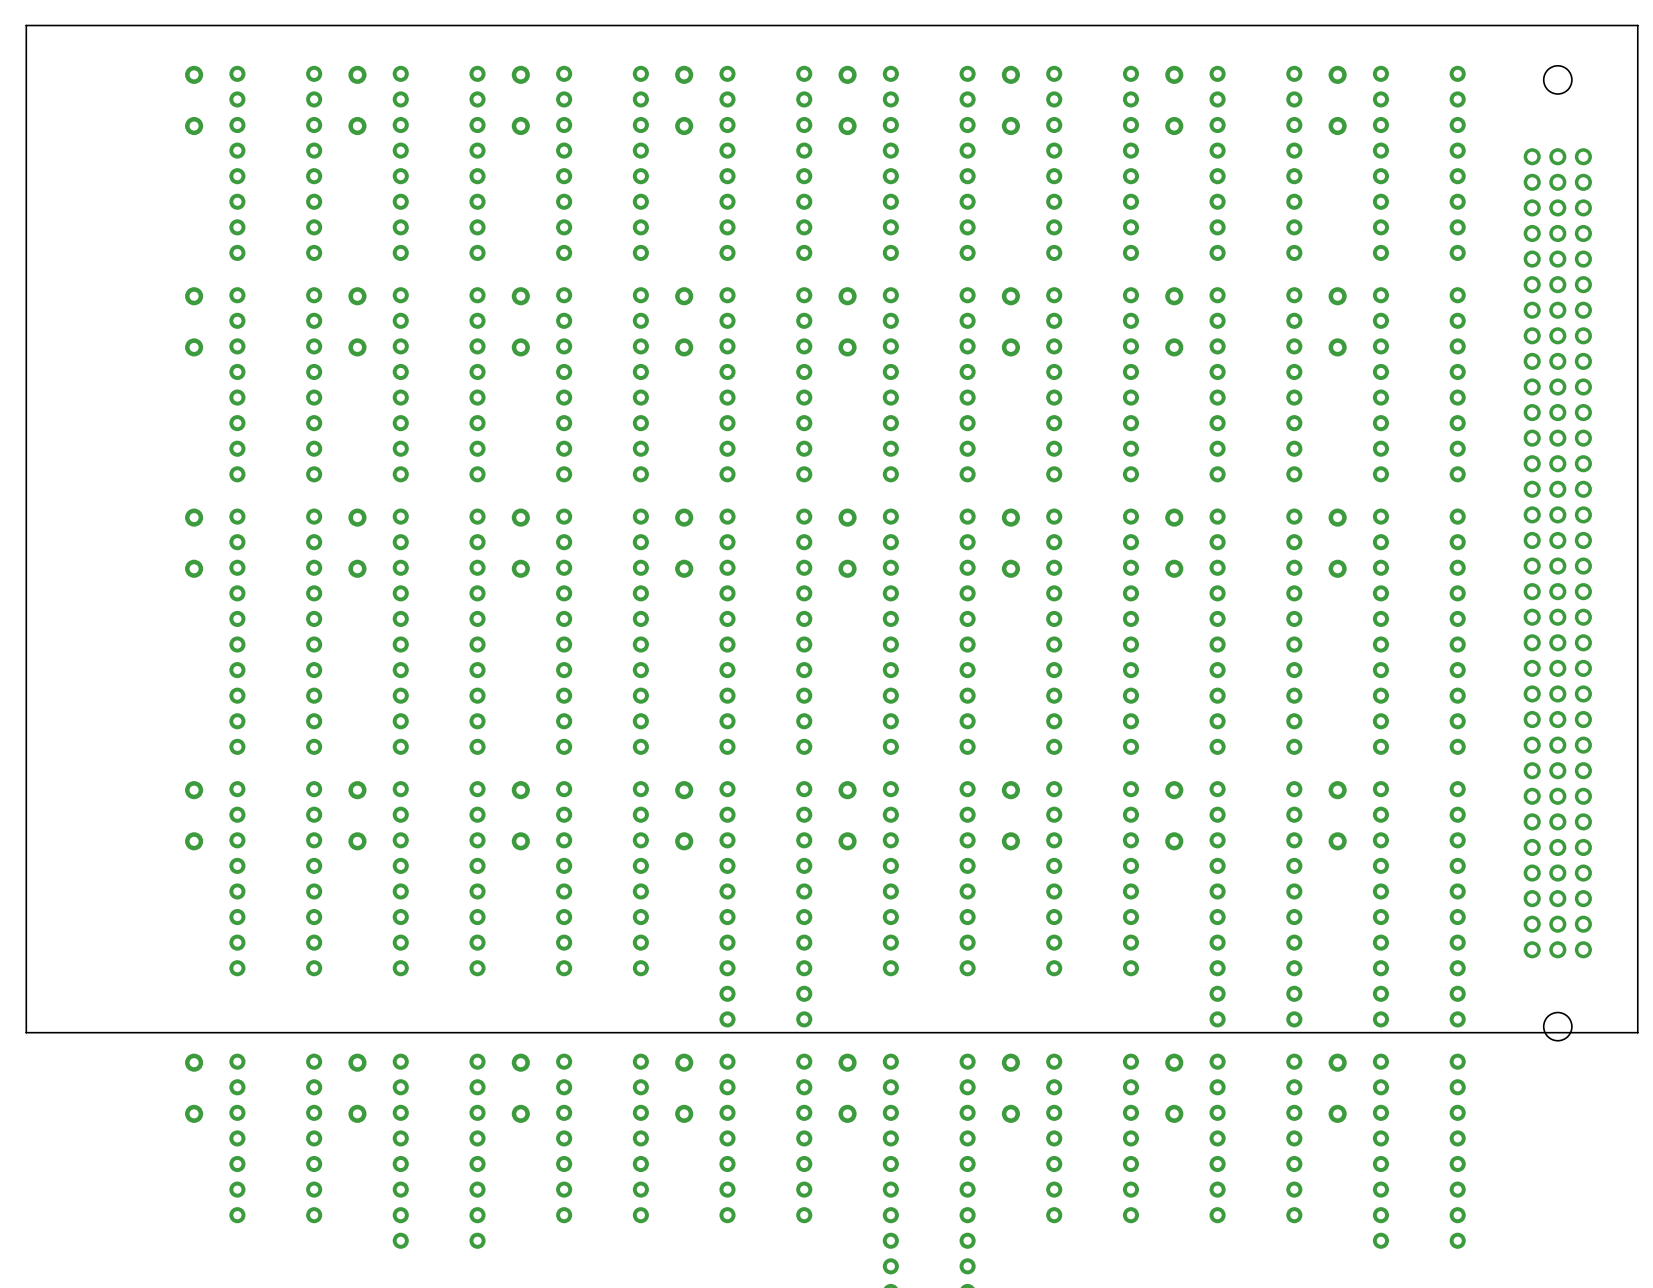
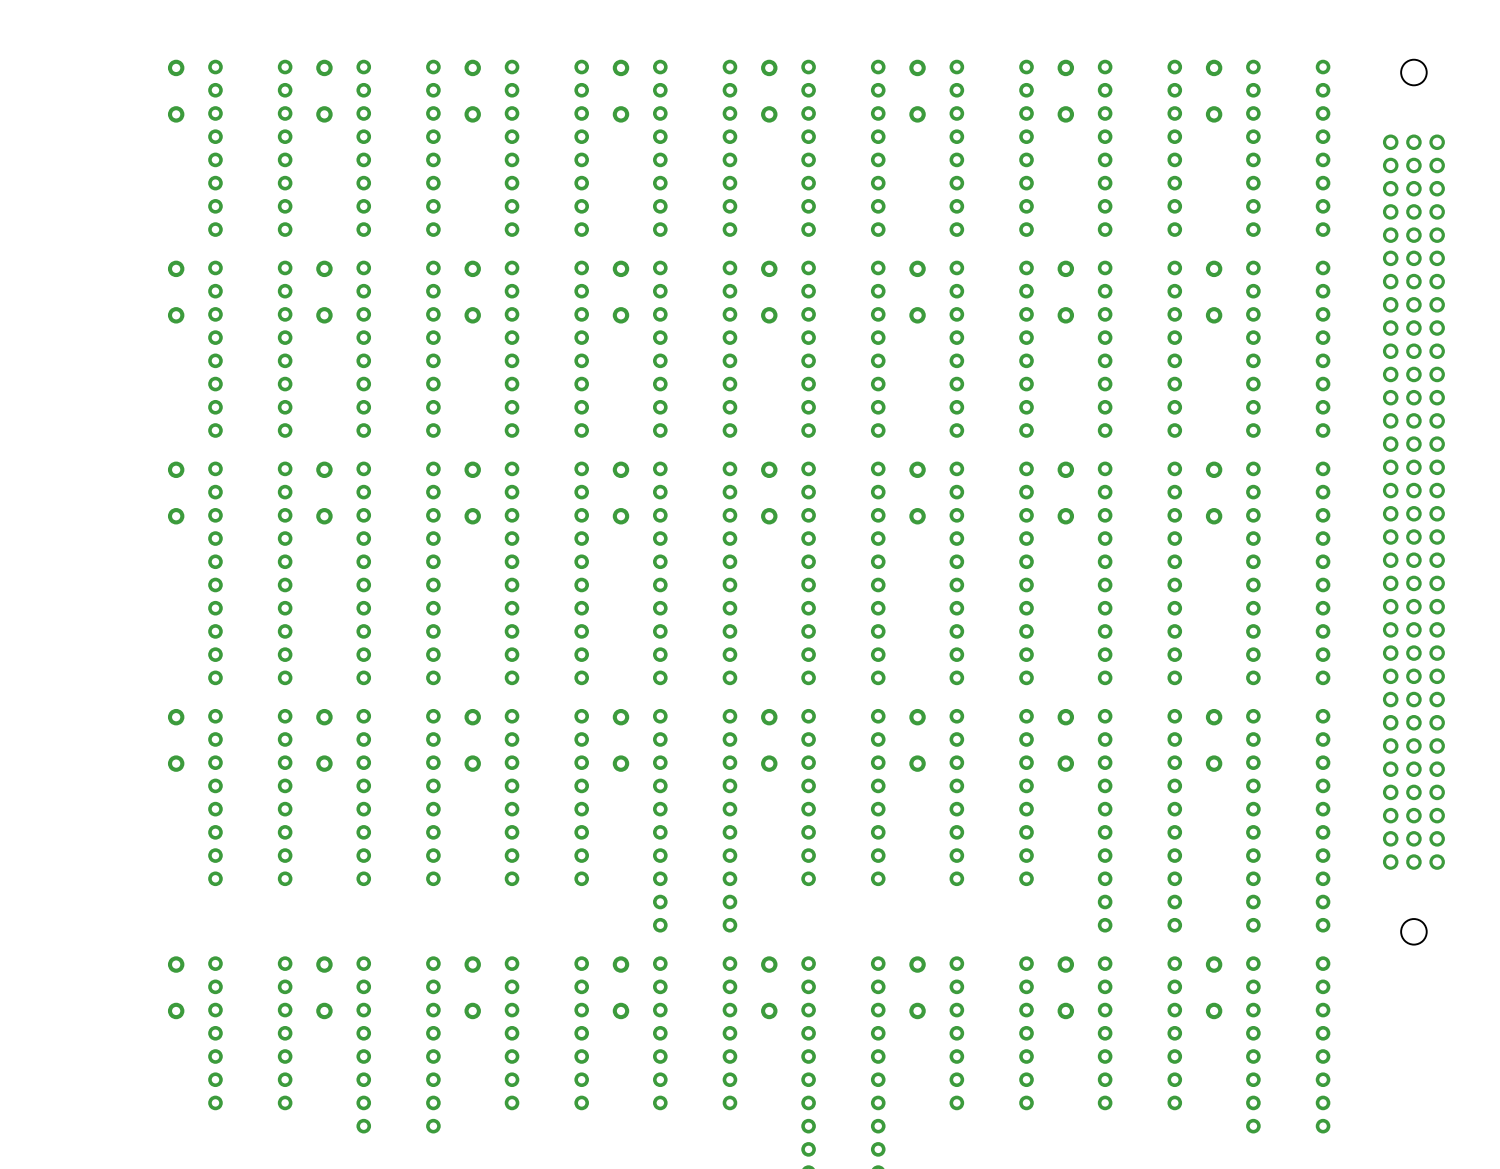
board edge: (1637, 25) (26, 25) (26, 1032) (1637, 1032) (1637, 25) -> none

